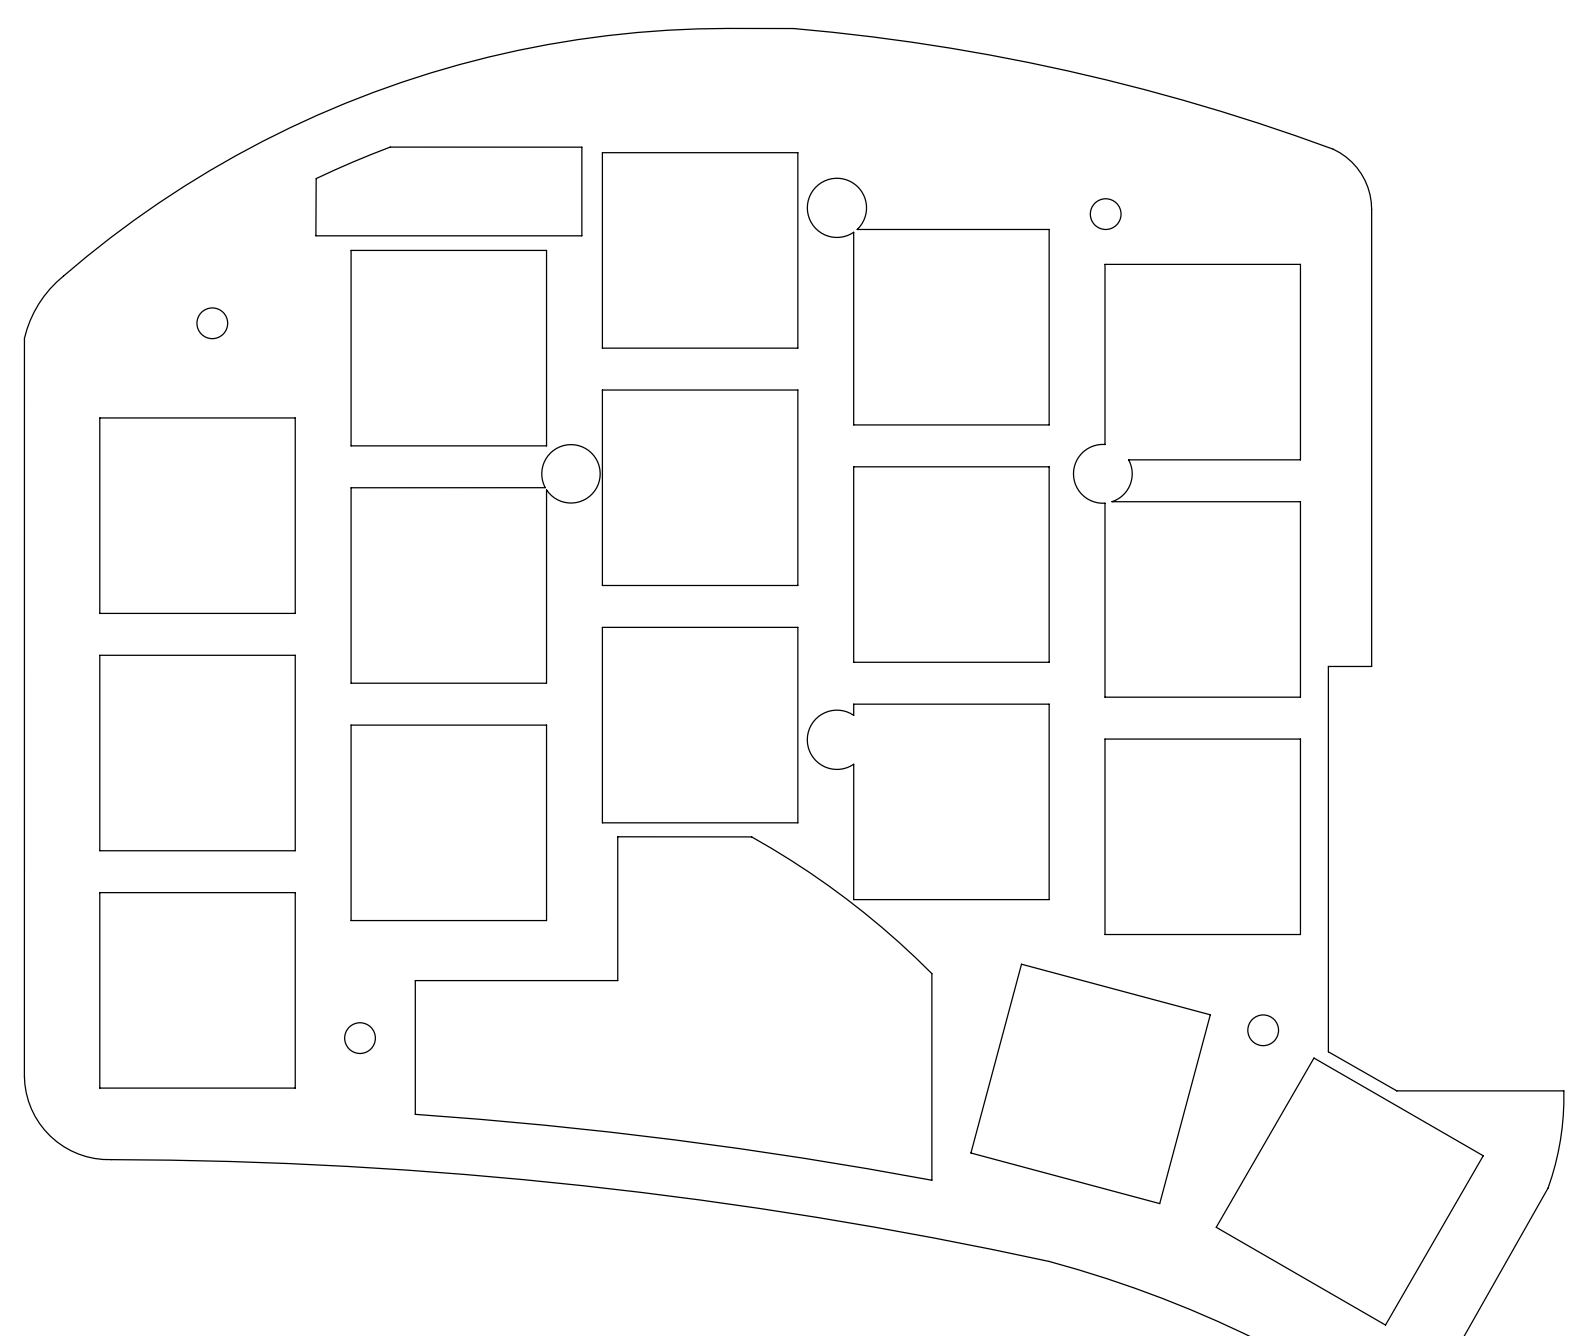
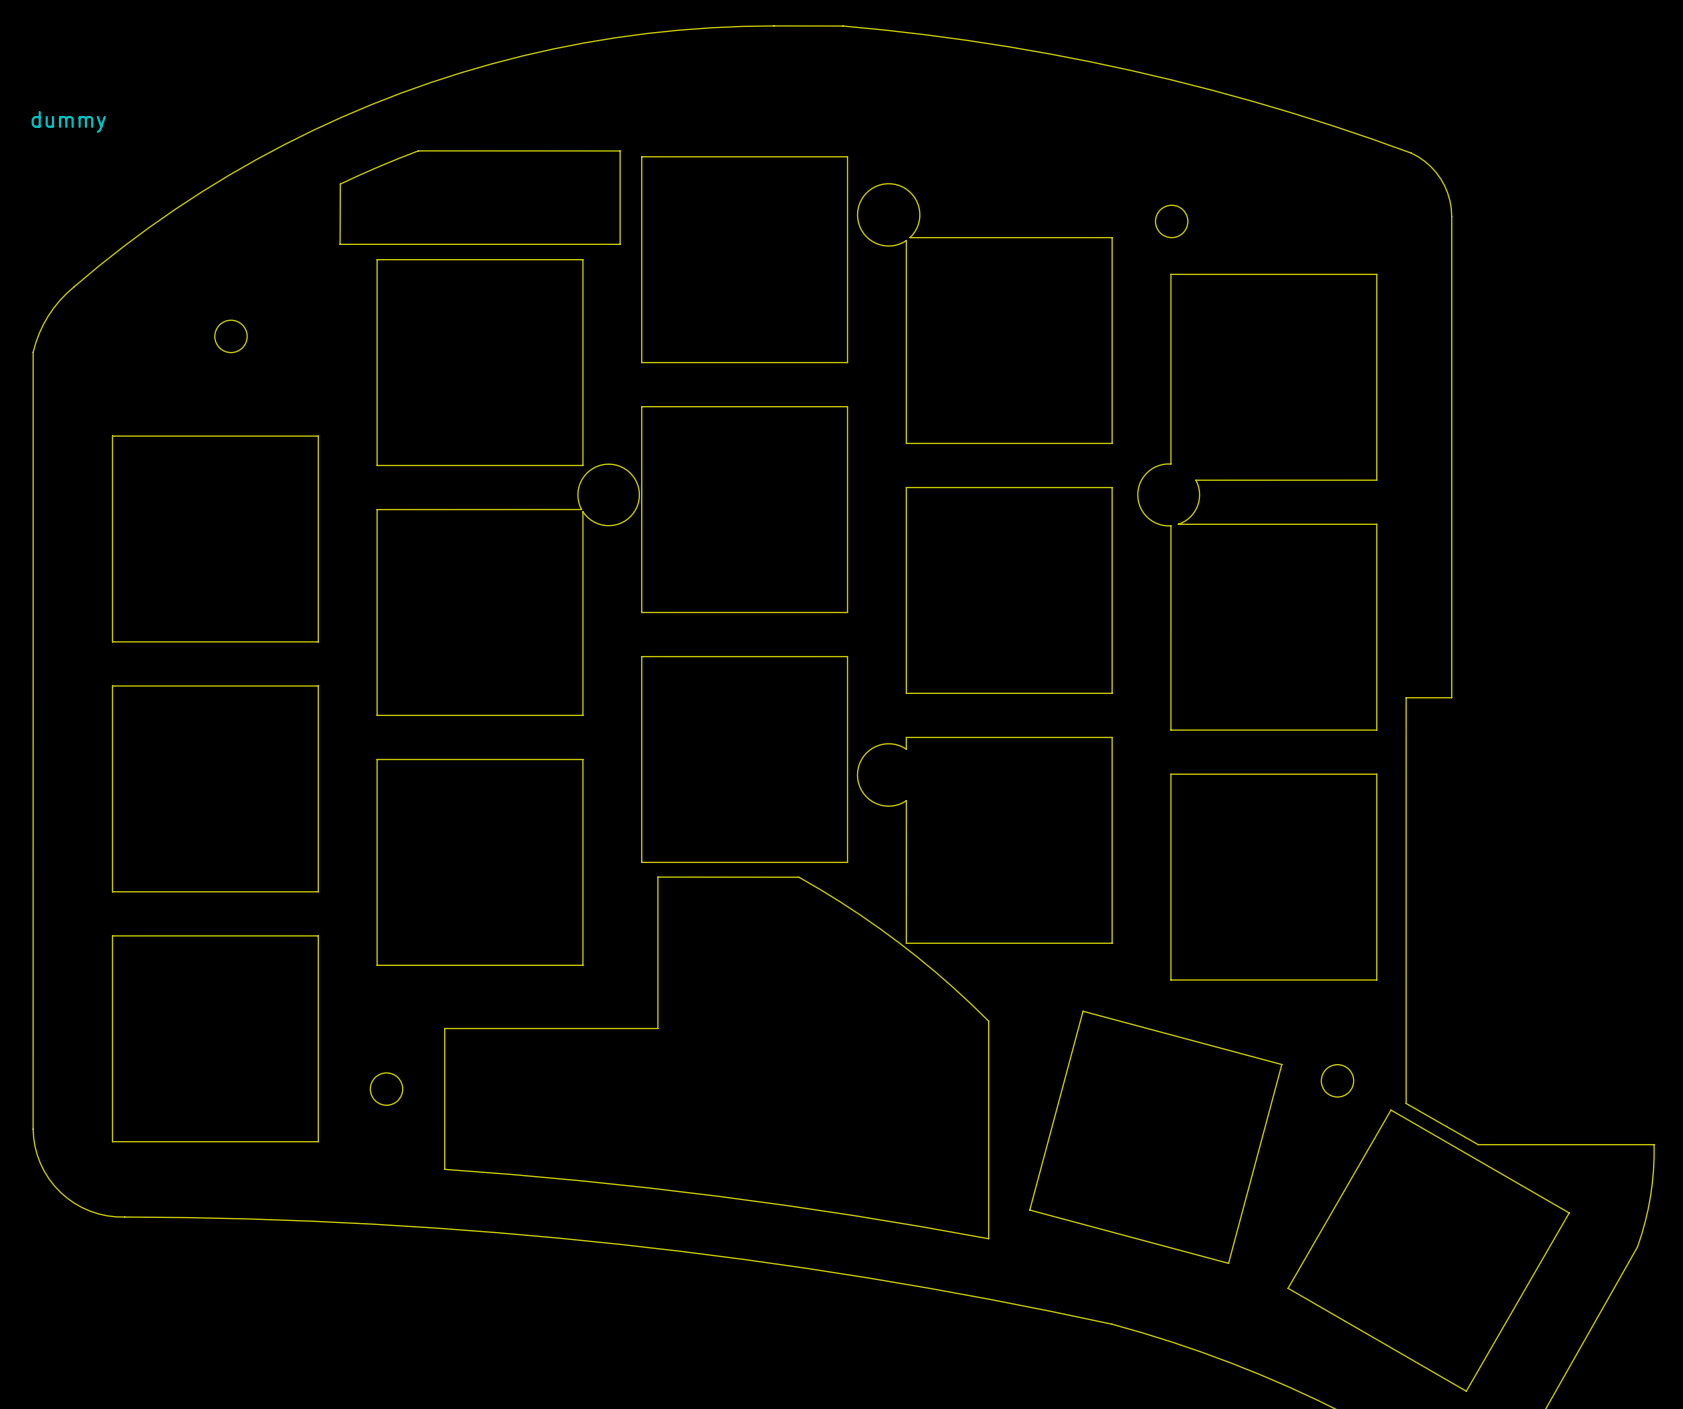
dummy: none -> (68, 121)

